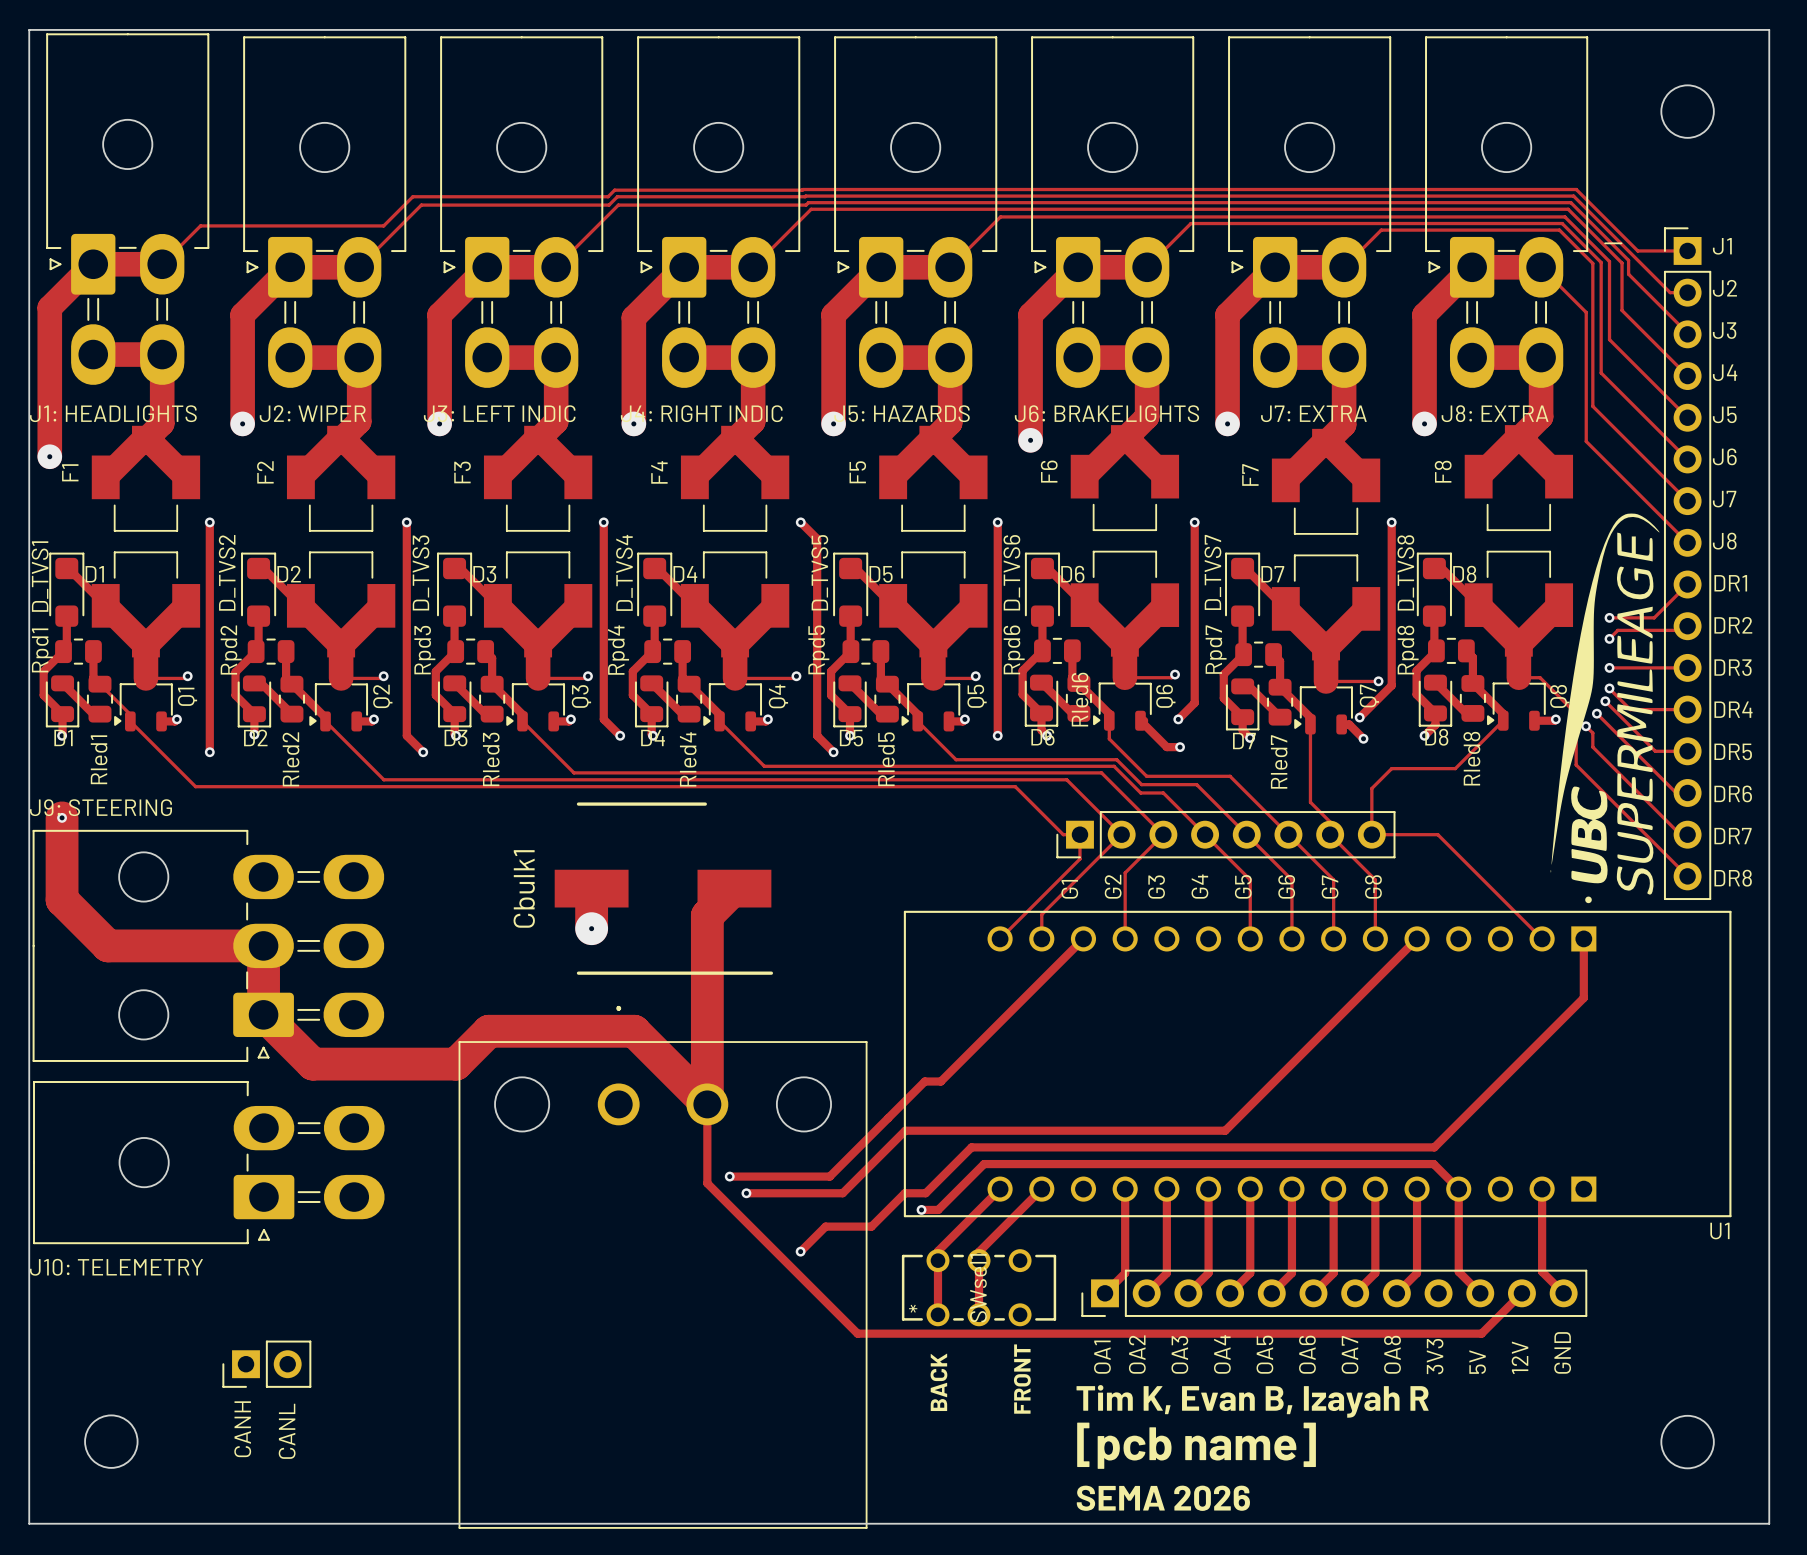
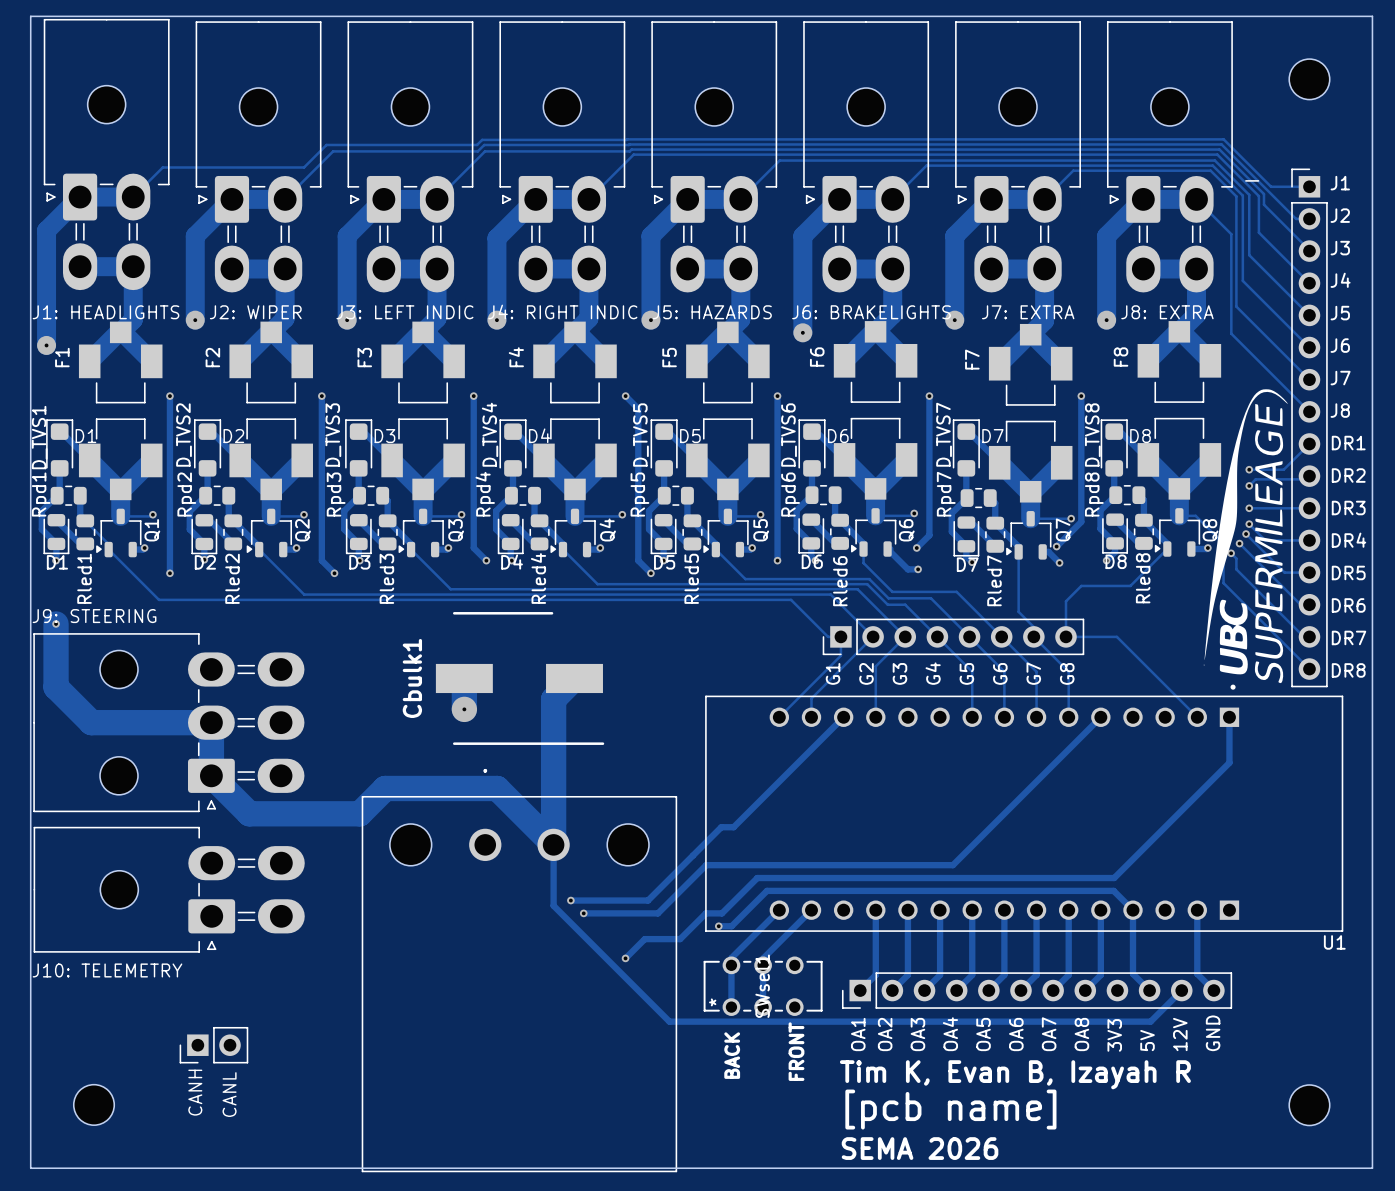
Rled6 name position: Rled6 (1079, 699) -> Rled6 (840, 581)

